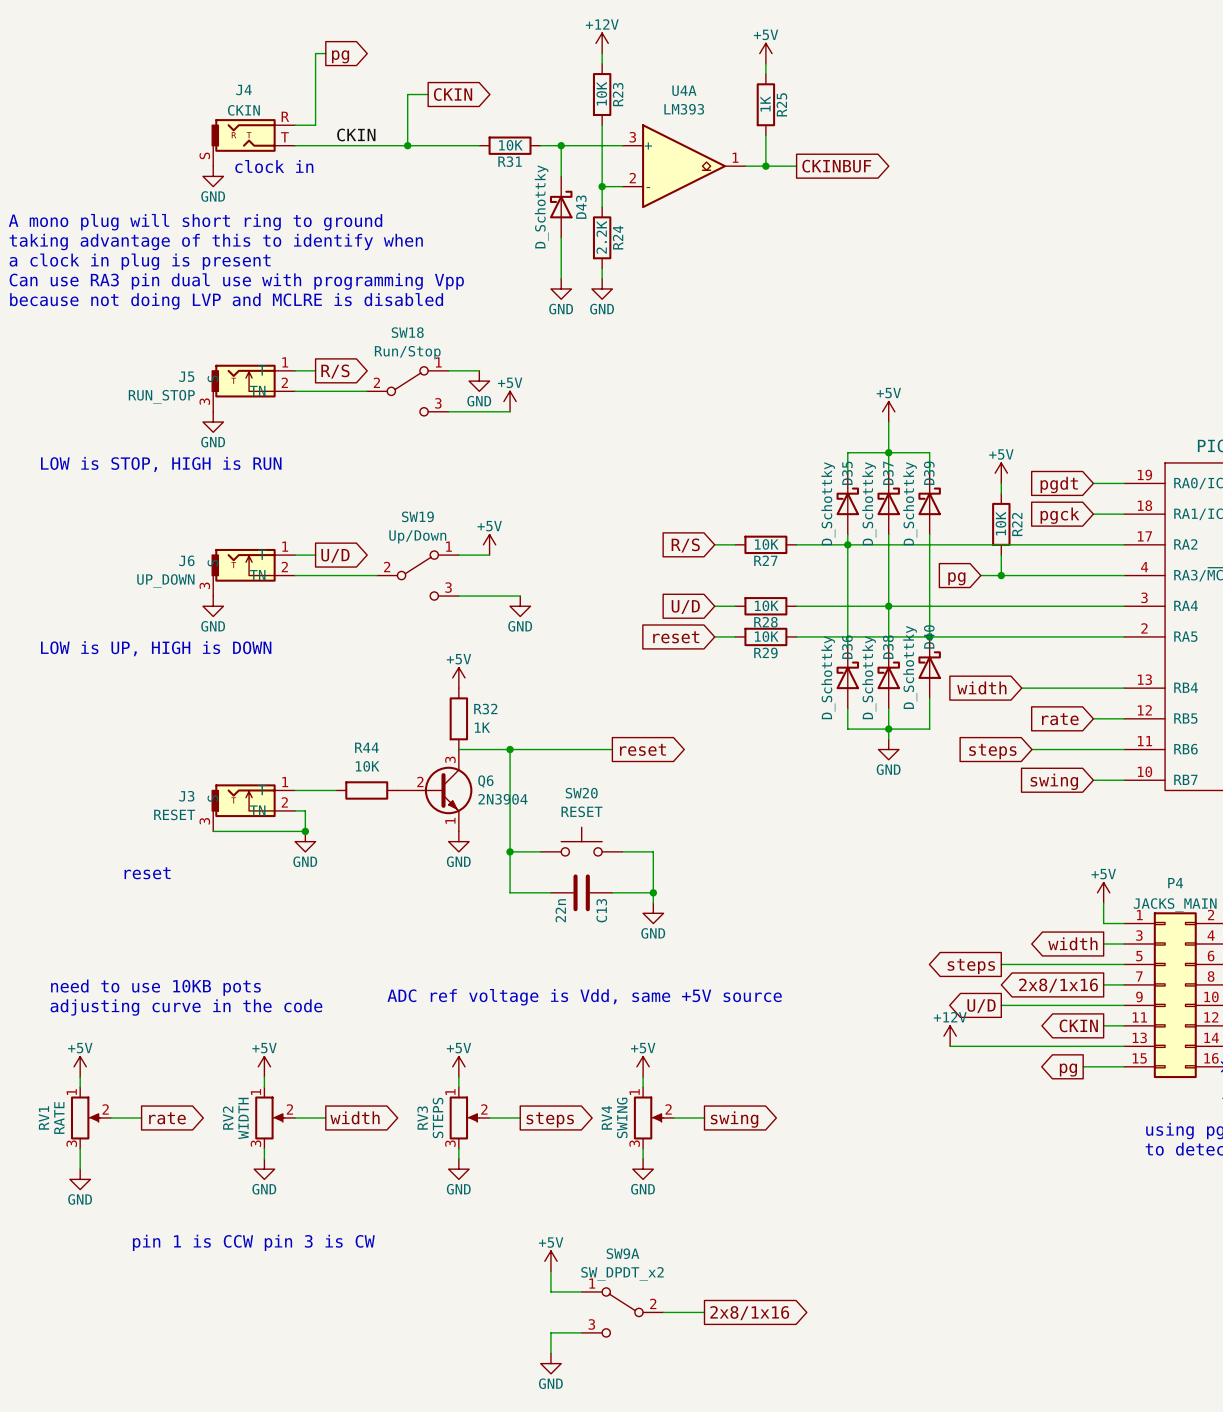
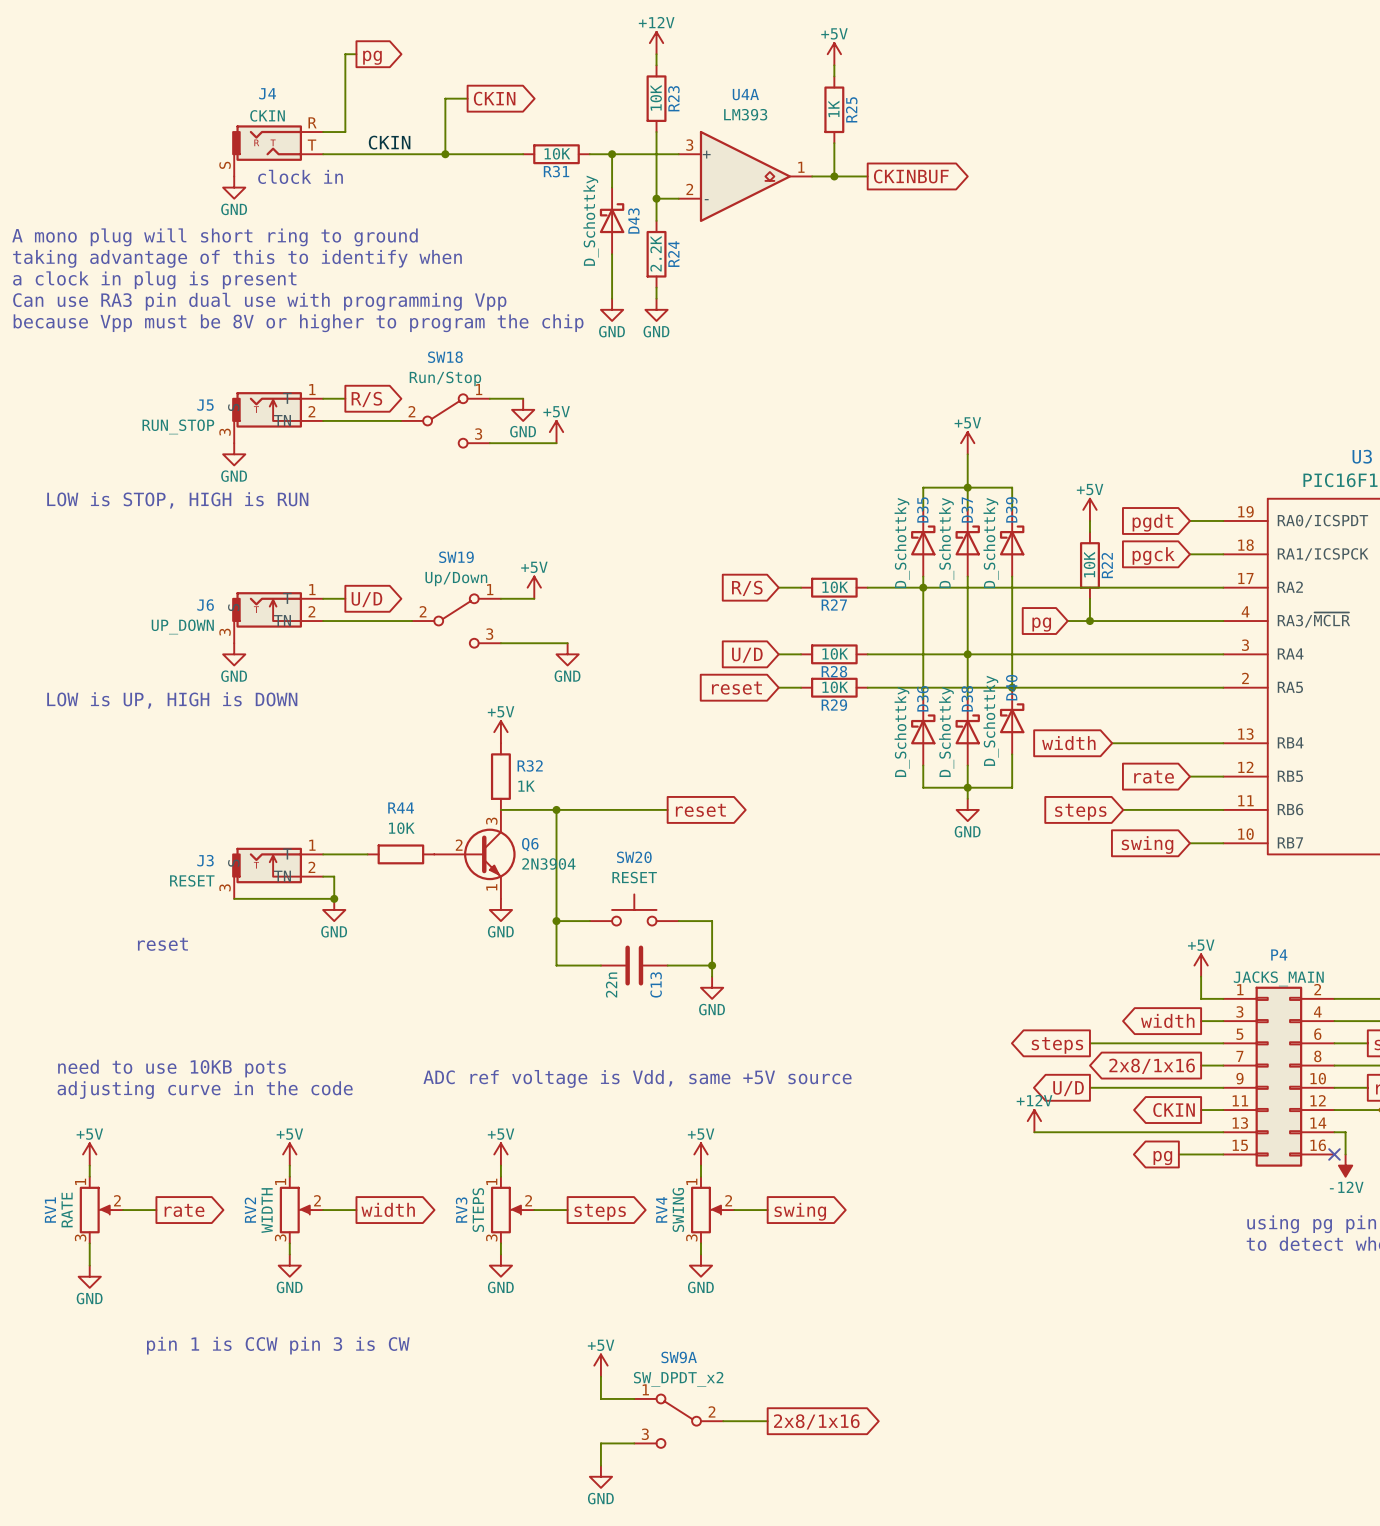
text: because not doing LVP and MCLRE is disabled (226, 301) -> because Vpp must be 8V or higher to program the chip (298, 323)

